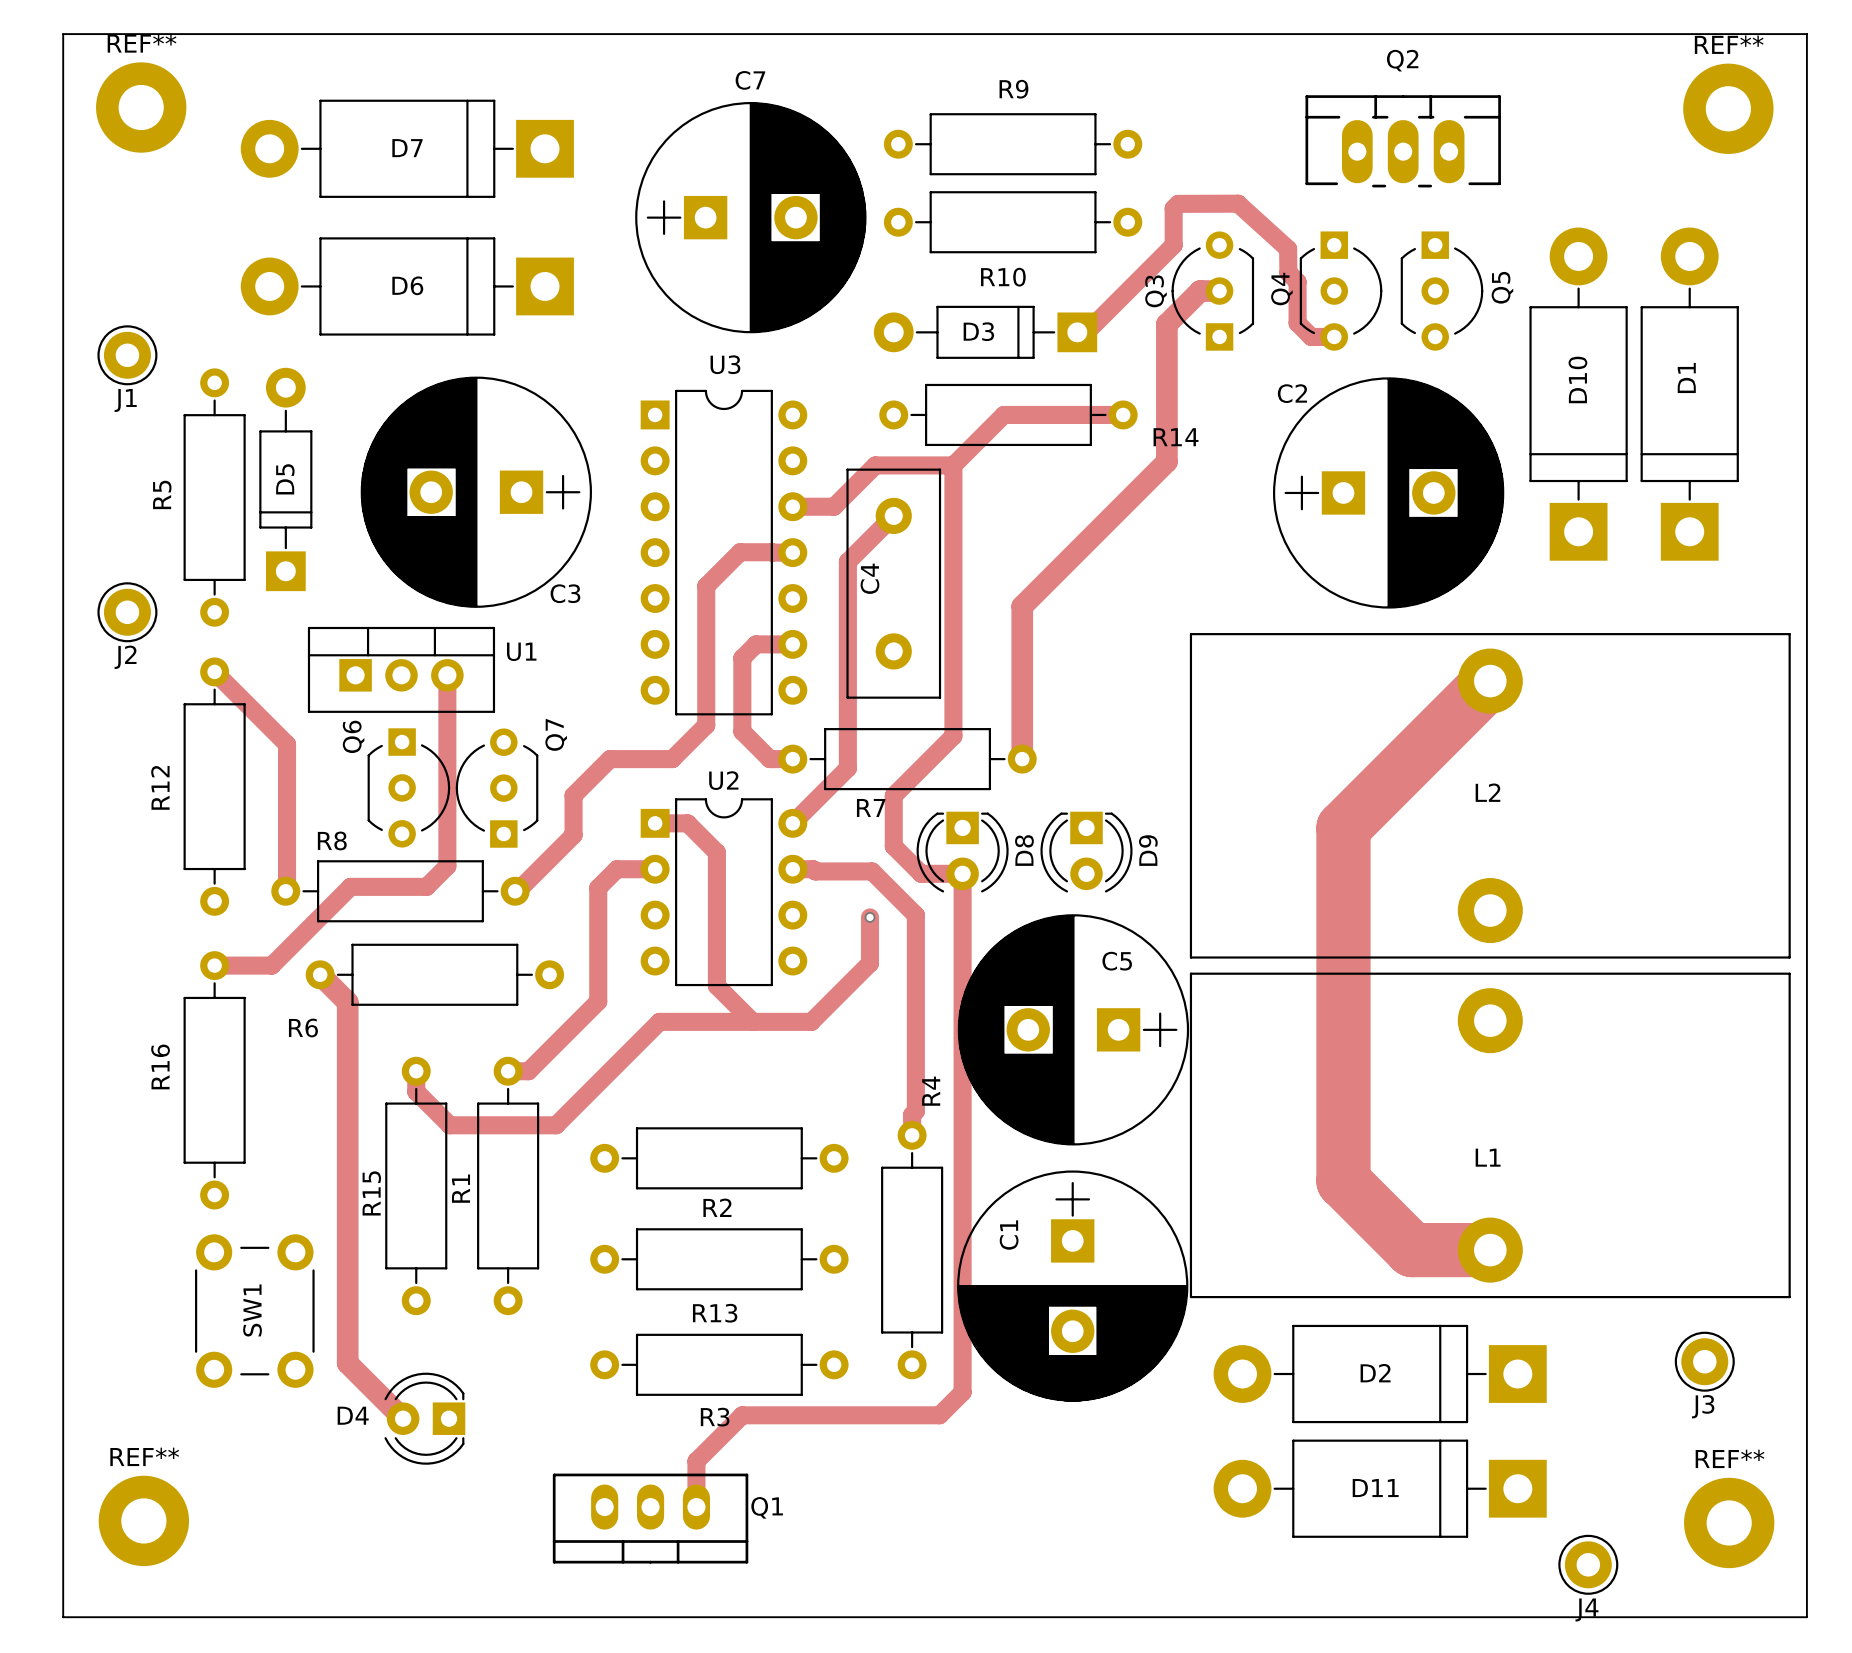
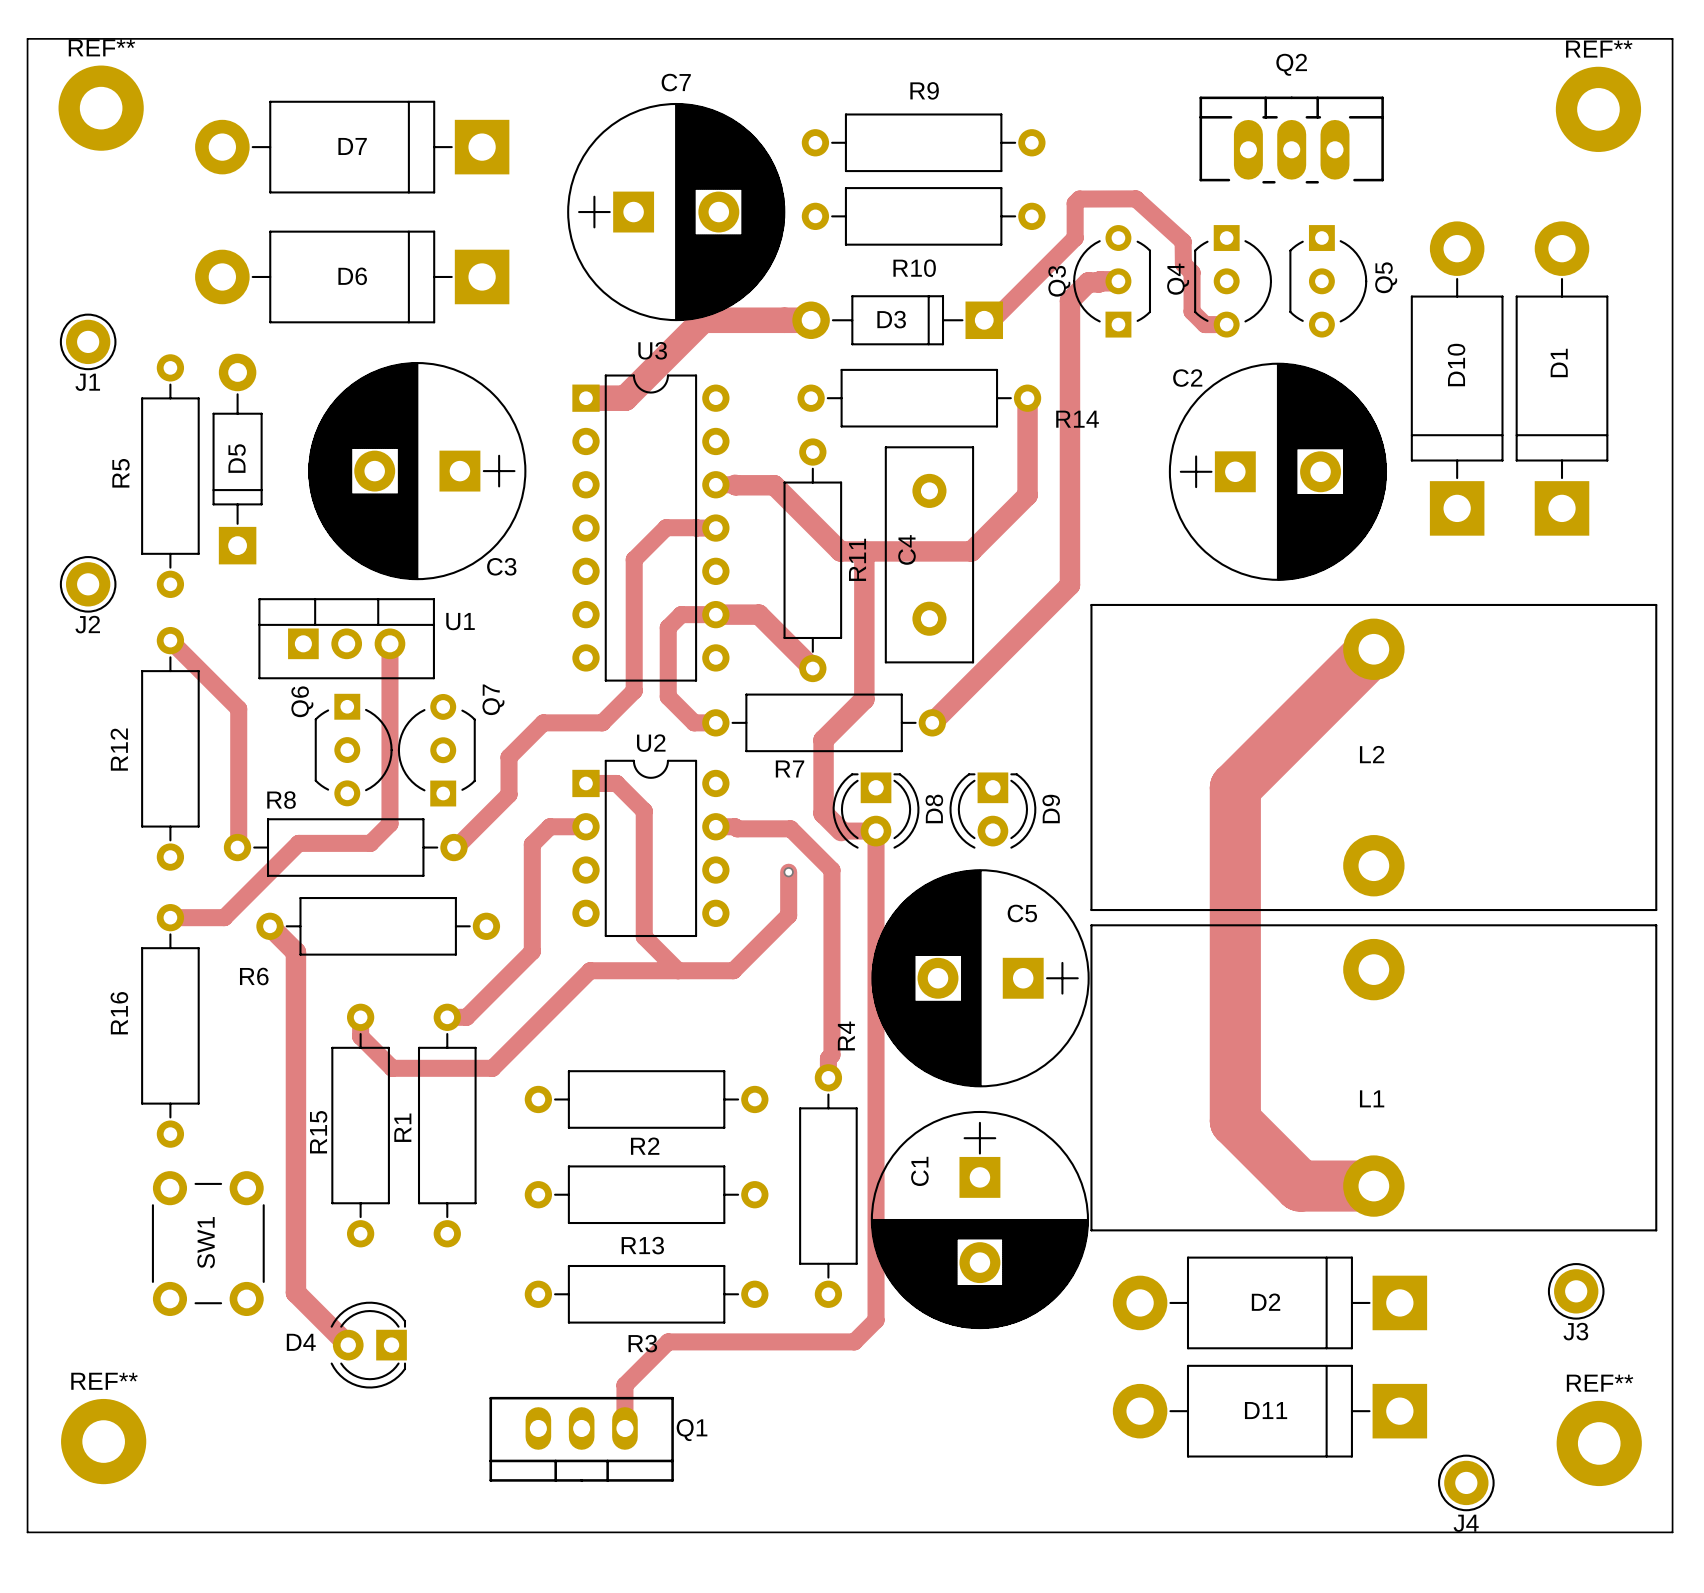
track: (1198, 292) (1166, 324) (1166, 461) (1022, 606) (1022, 759) -> (1099, 282) (1088, 282) (1069, 300) (1069, 585) (932, 722)
track: none -> (811, 320) (703, 320) (625, 398) (585, 398)
track: (1123, 414) (1003, 414) (953, 465) -> (1027, 398) (1027, 495) (971, 551) (840, 551) (774, 485) (735, 484)
track: (953, 465) (953, 736) (893, 795) (893, 846) (921, 873) (925, 873) -> (864, 551) (864, 699) (823, 740) (823, 813) (841, 831)
track: (953, 465) (875, 465) (834, 506) (813, 506) -> none
track: (893, 515) (847, 561) (847, 768) (792, 823) -> none
C4 position: (893, 583) -> (929, 554)
R11: none -> (812, 560)
track: none -> (715, 614) (758, 614) (812, 668)

